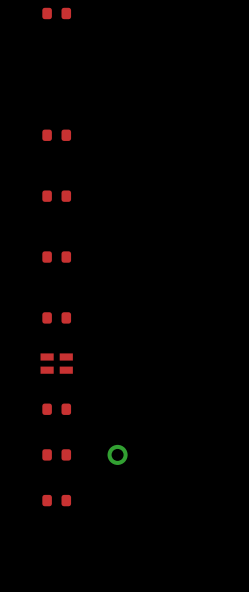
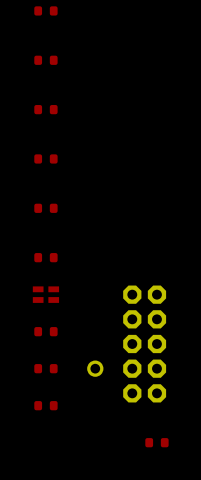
part: none -> (45, 60)
part: none -> (144, 344)
part: none -> (156, 442)

